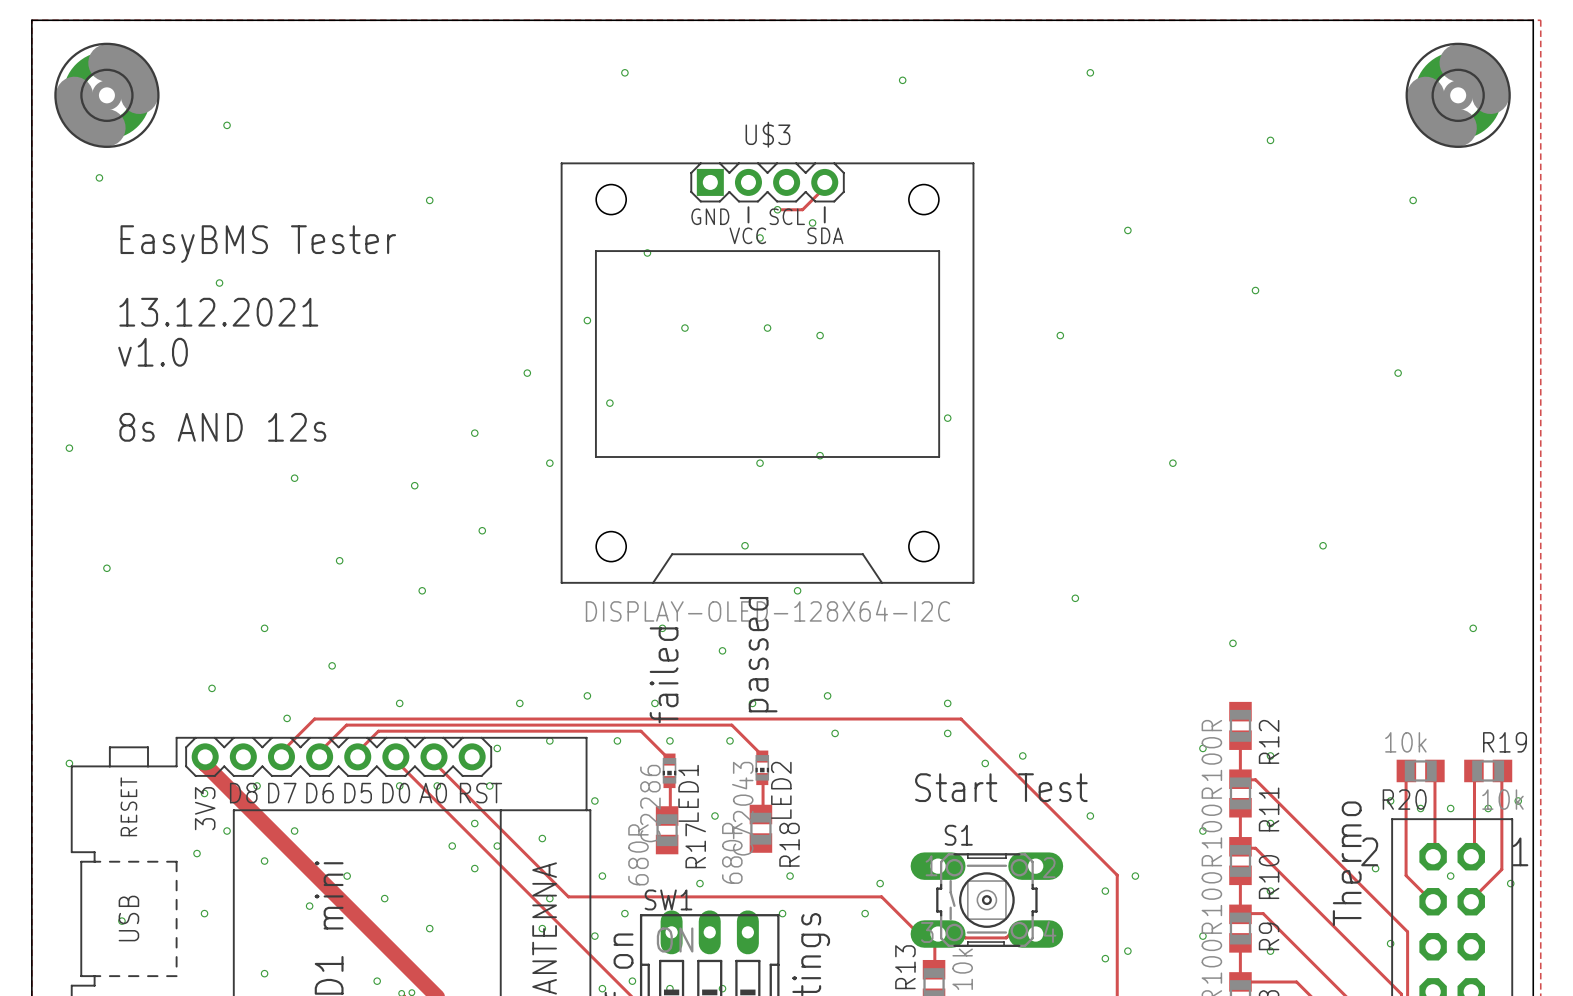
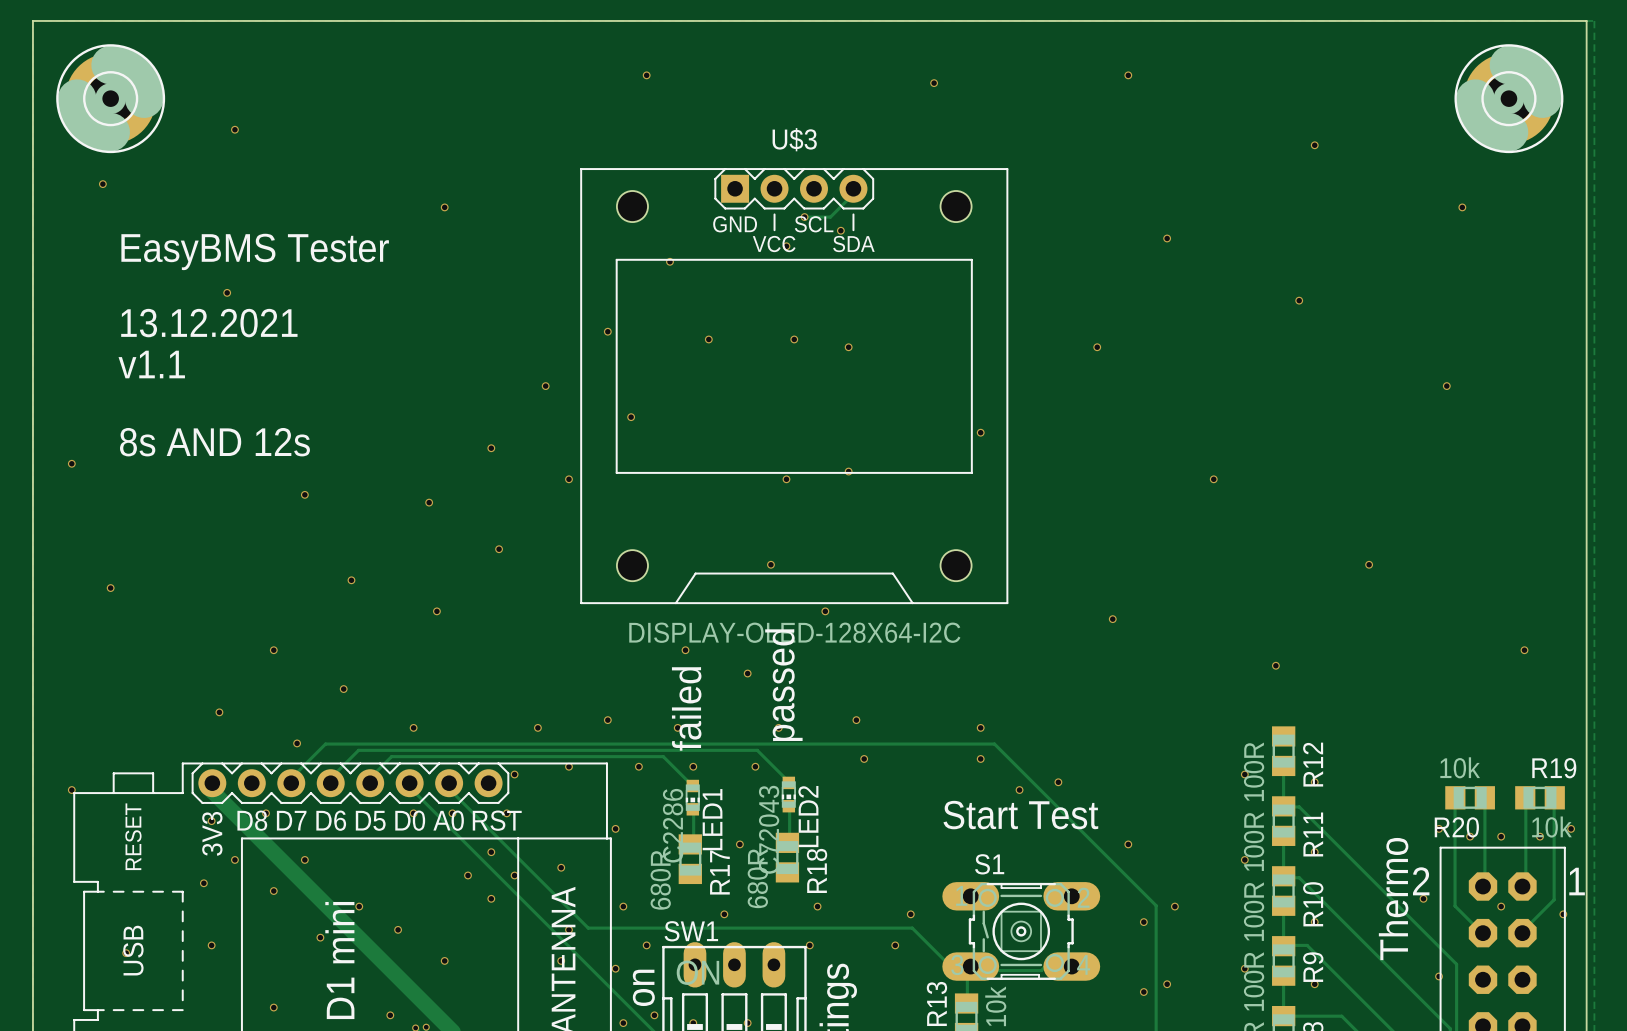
text: v1.0 (153, 352) -> v1.1 (151, 364)

